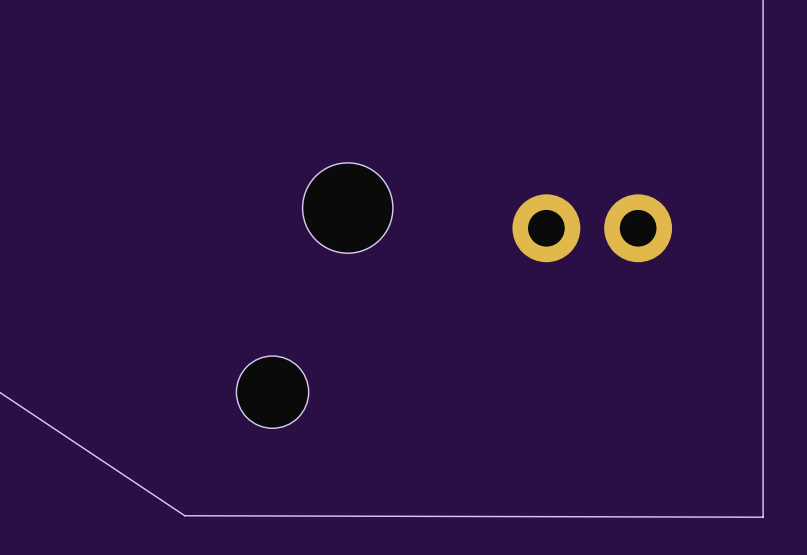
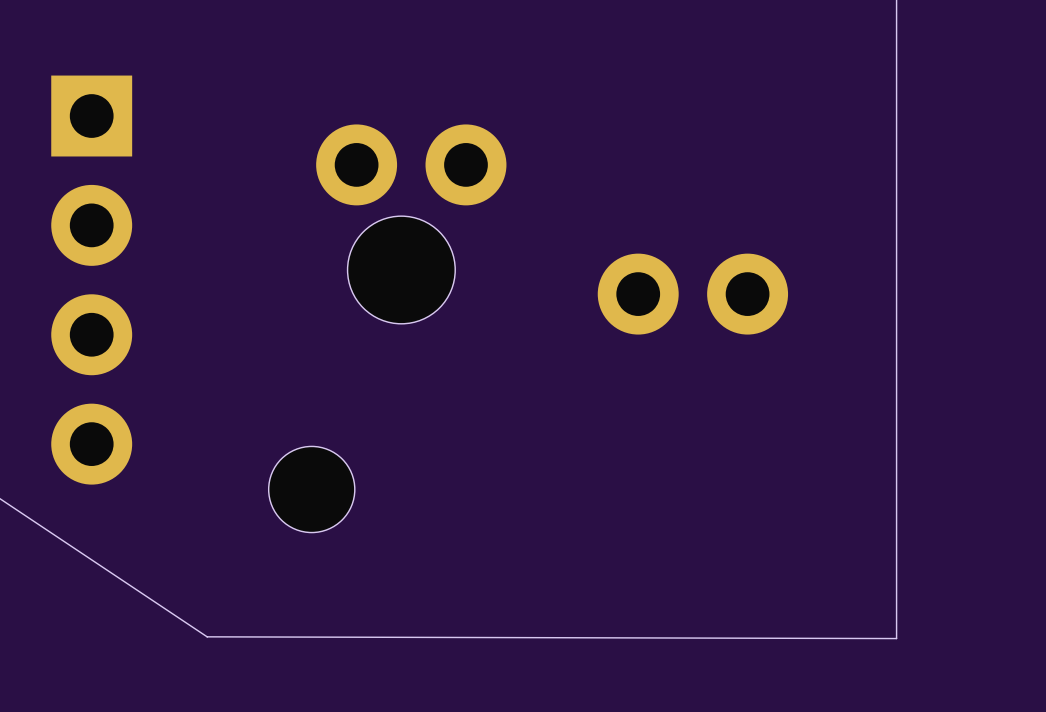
part: none -> (411, 164)
part: none -> (91, 280)

